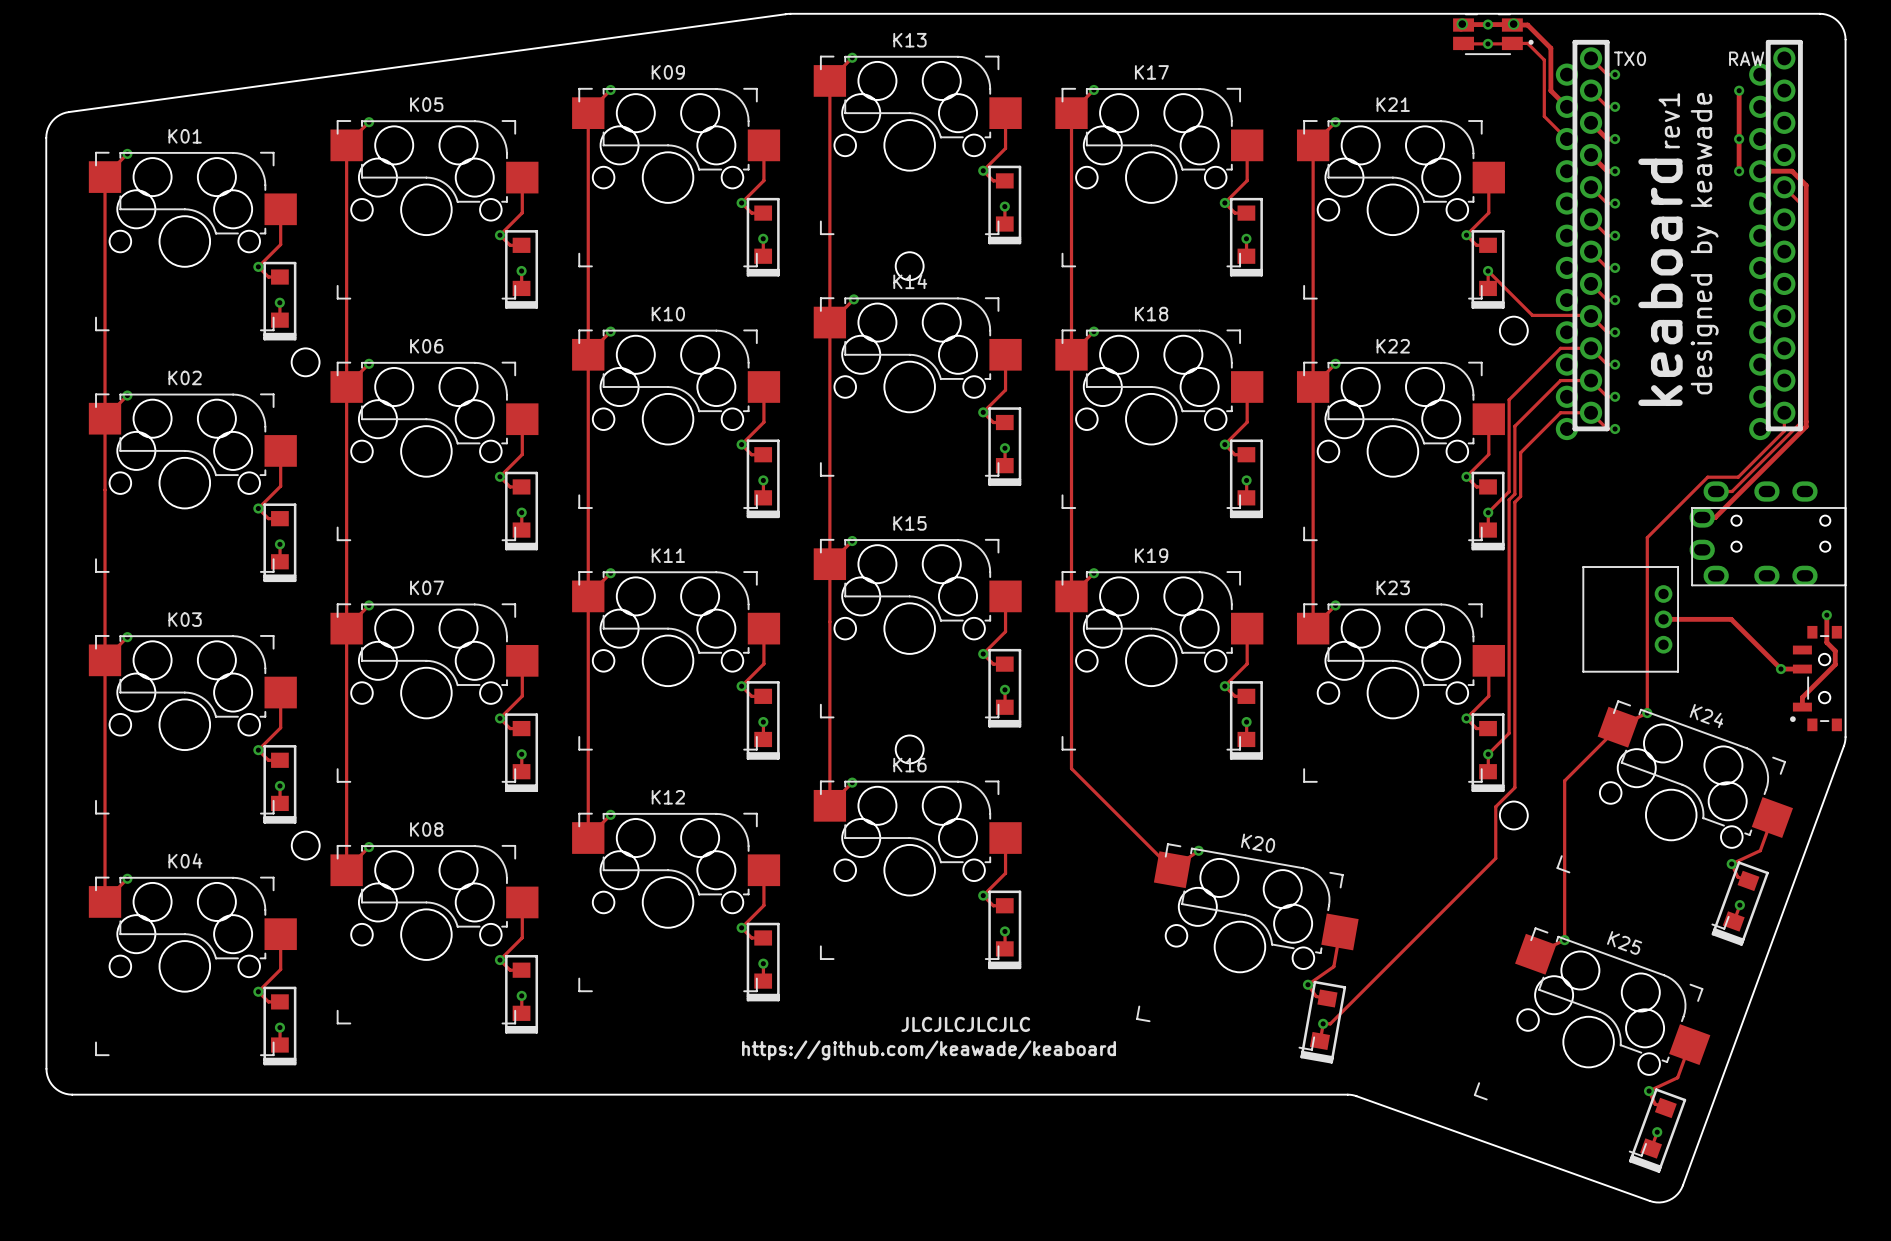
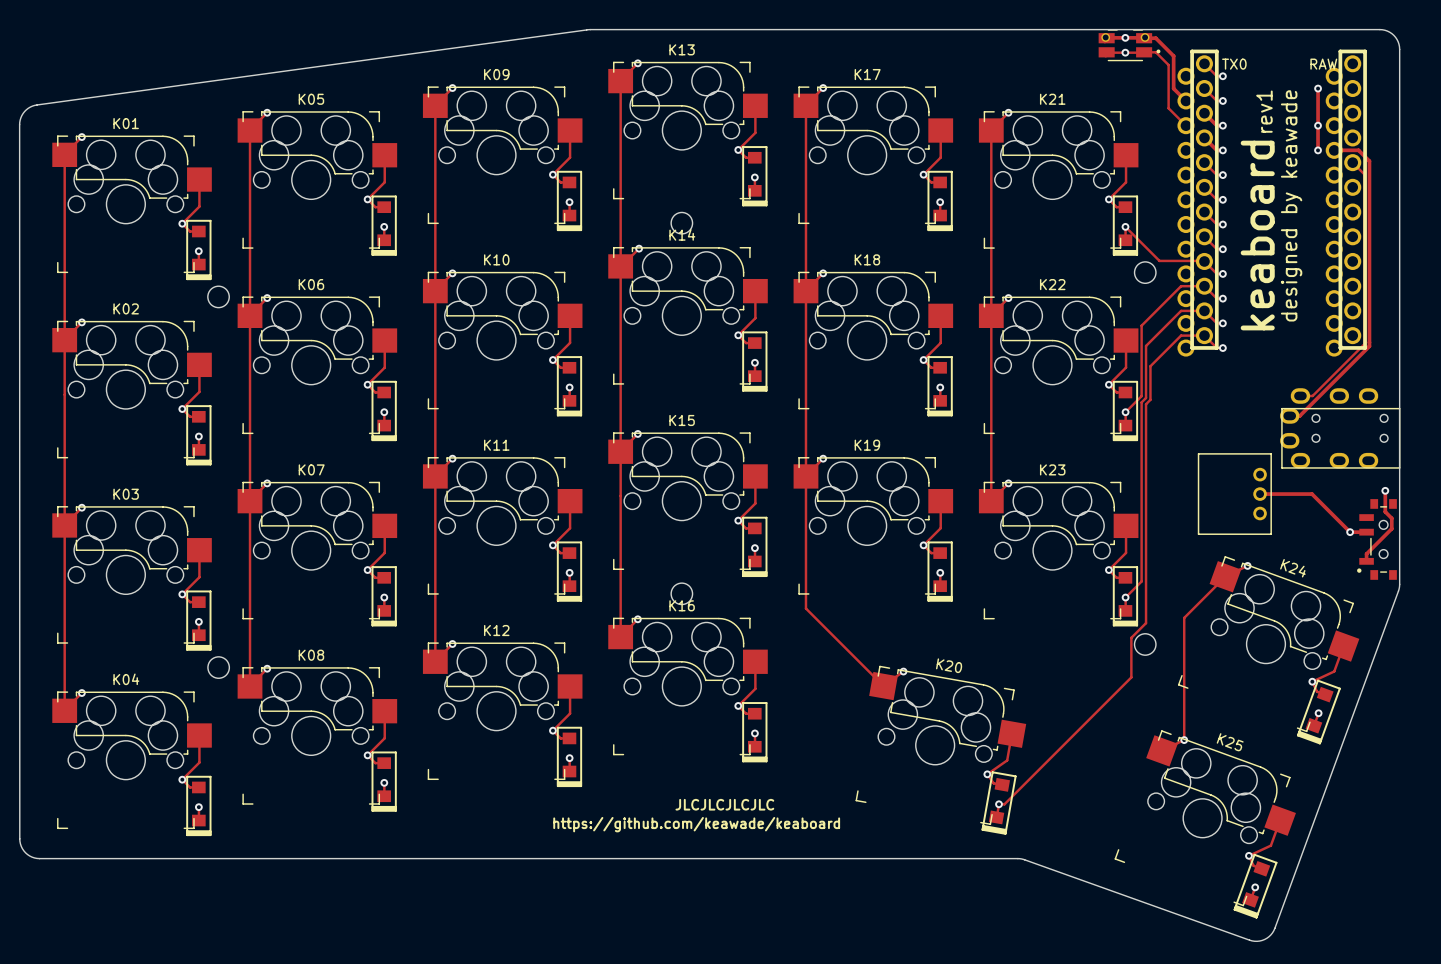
track: (1784, 412) (1784, 431) (1738, 477) (1707, 477) (1647, 537) (1647, 713) -> none

